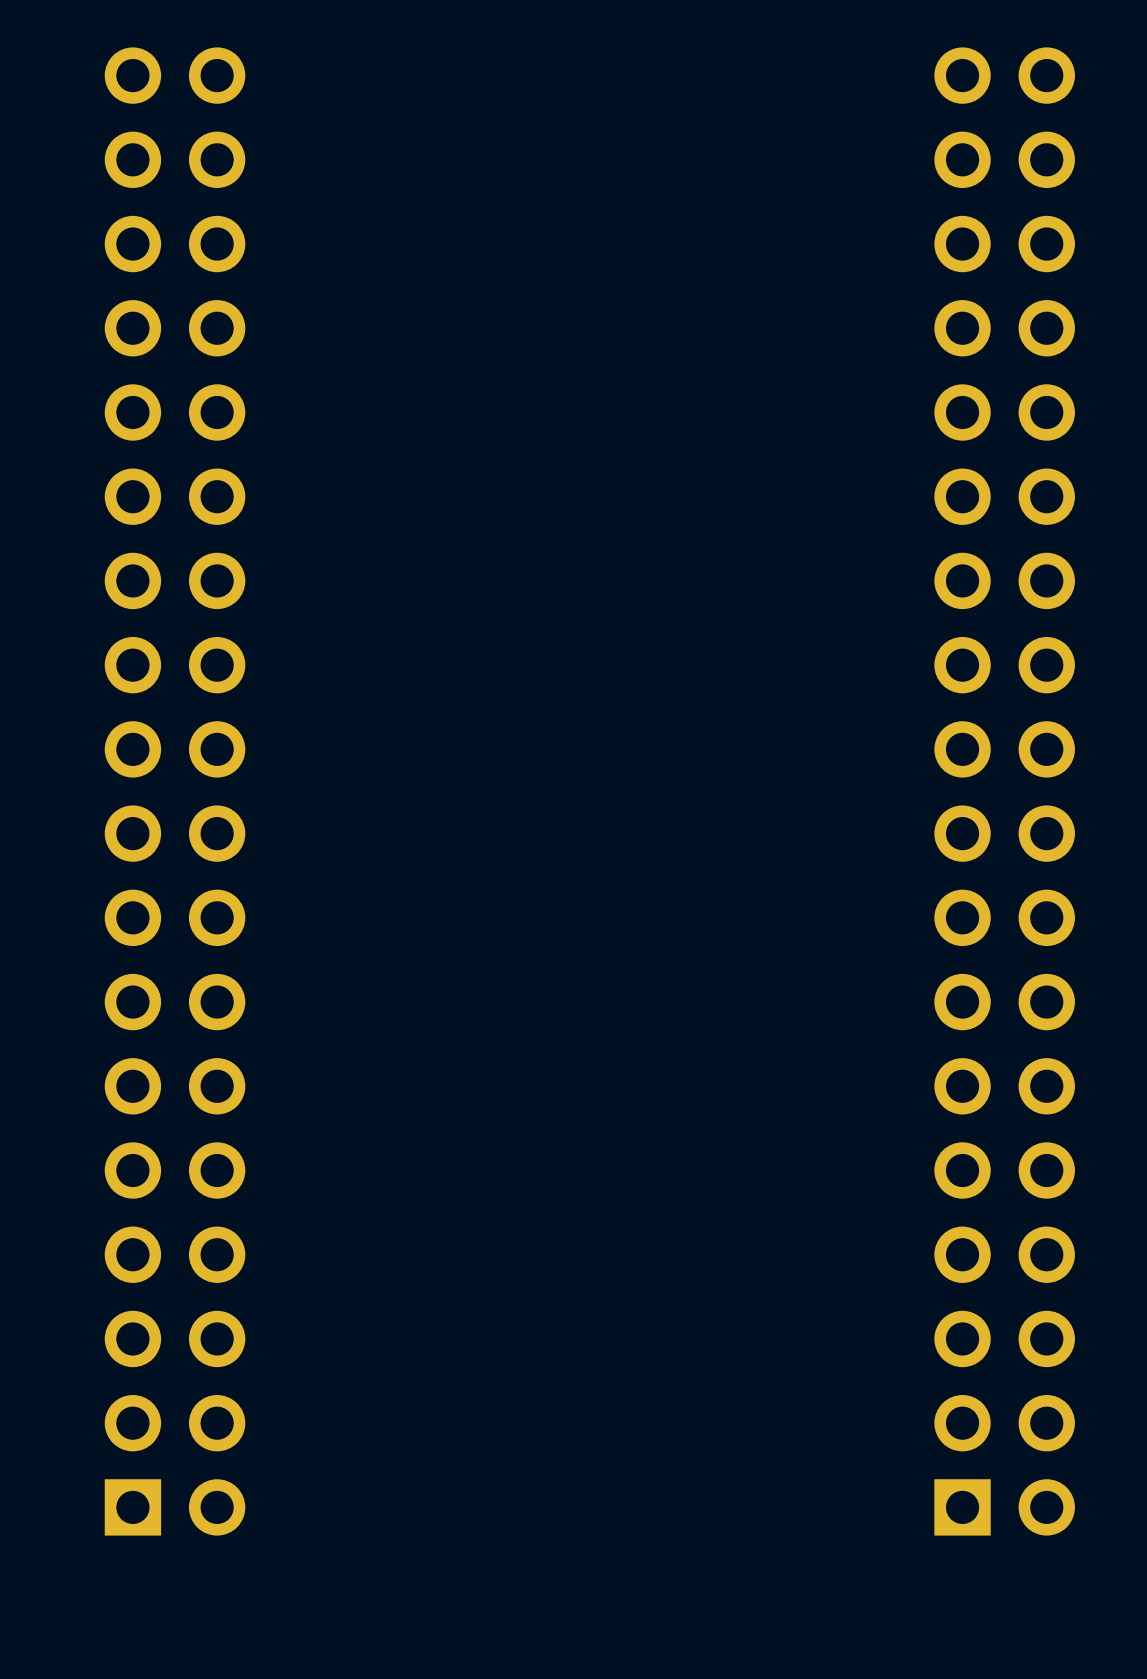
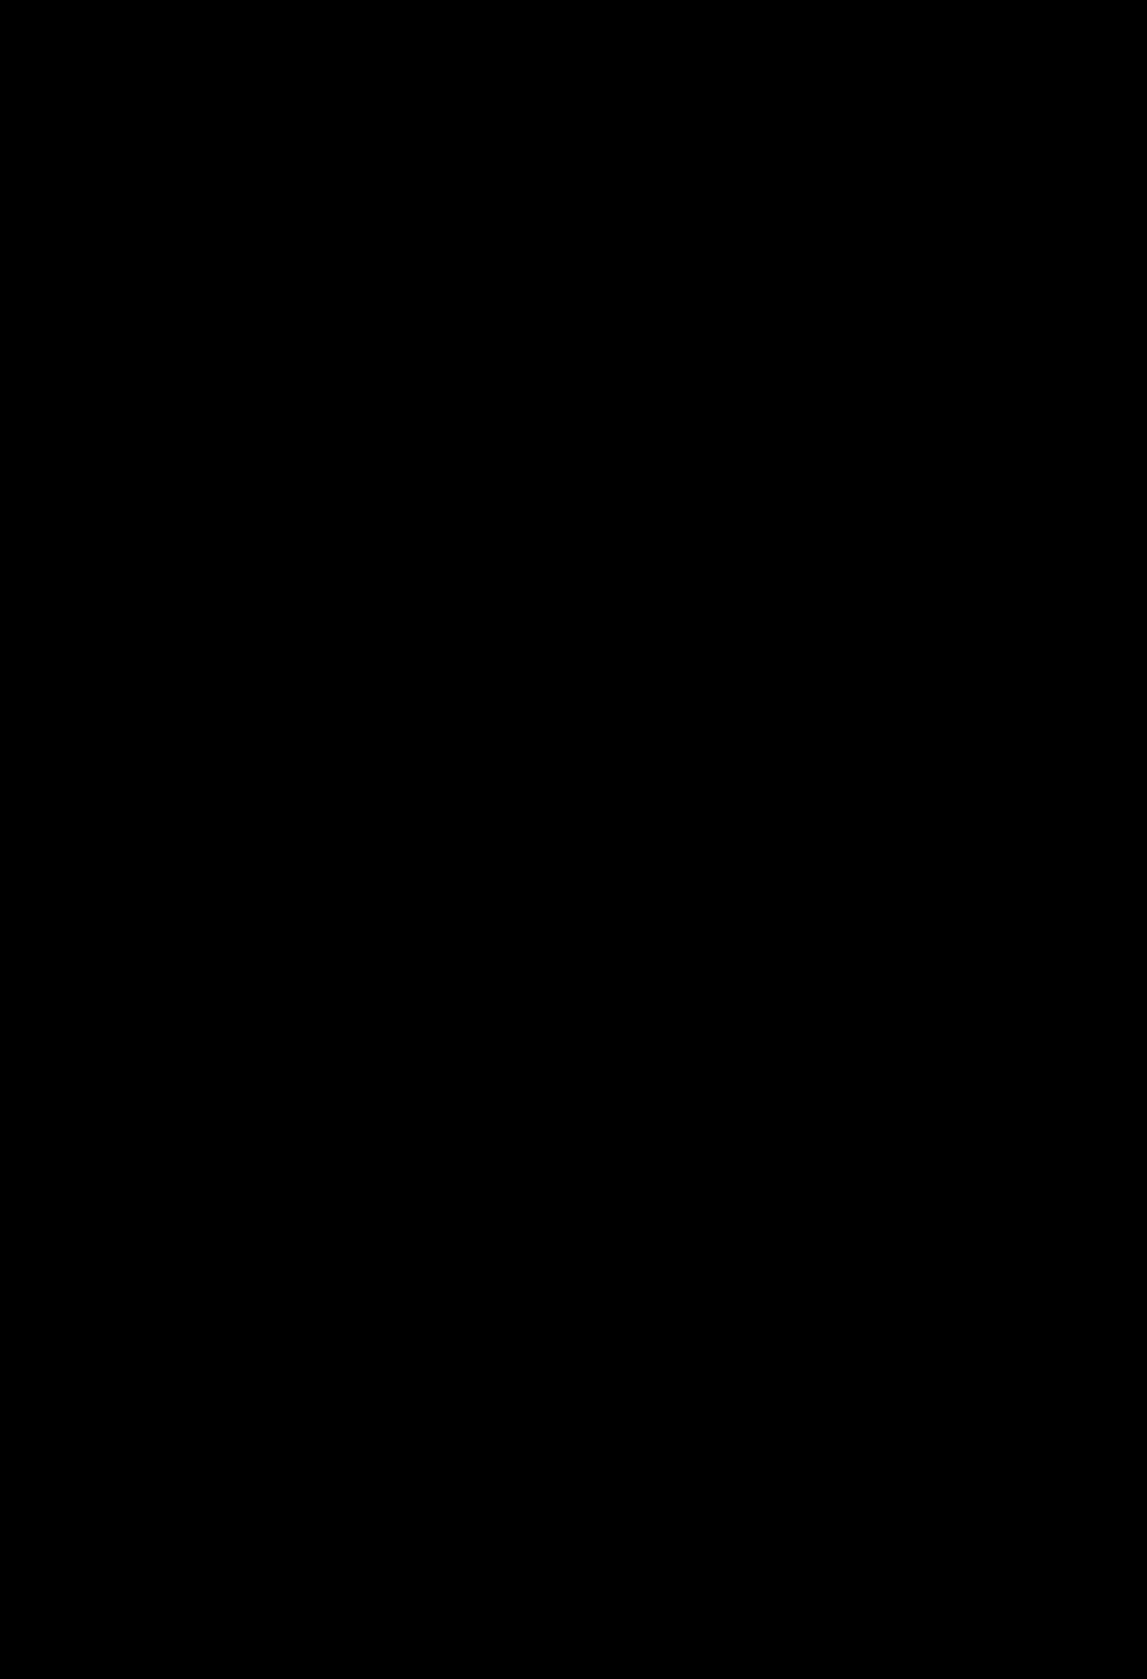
part: (175, 791) -> none
part: (1004, 791) -> none

